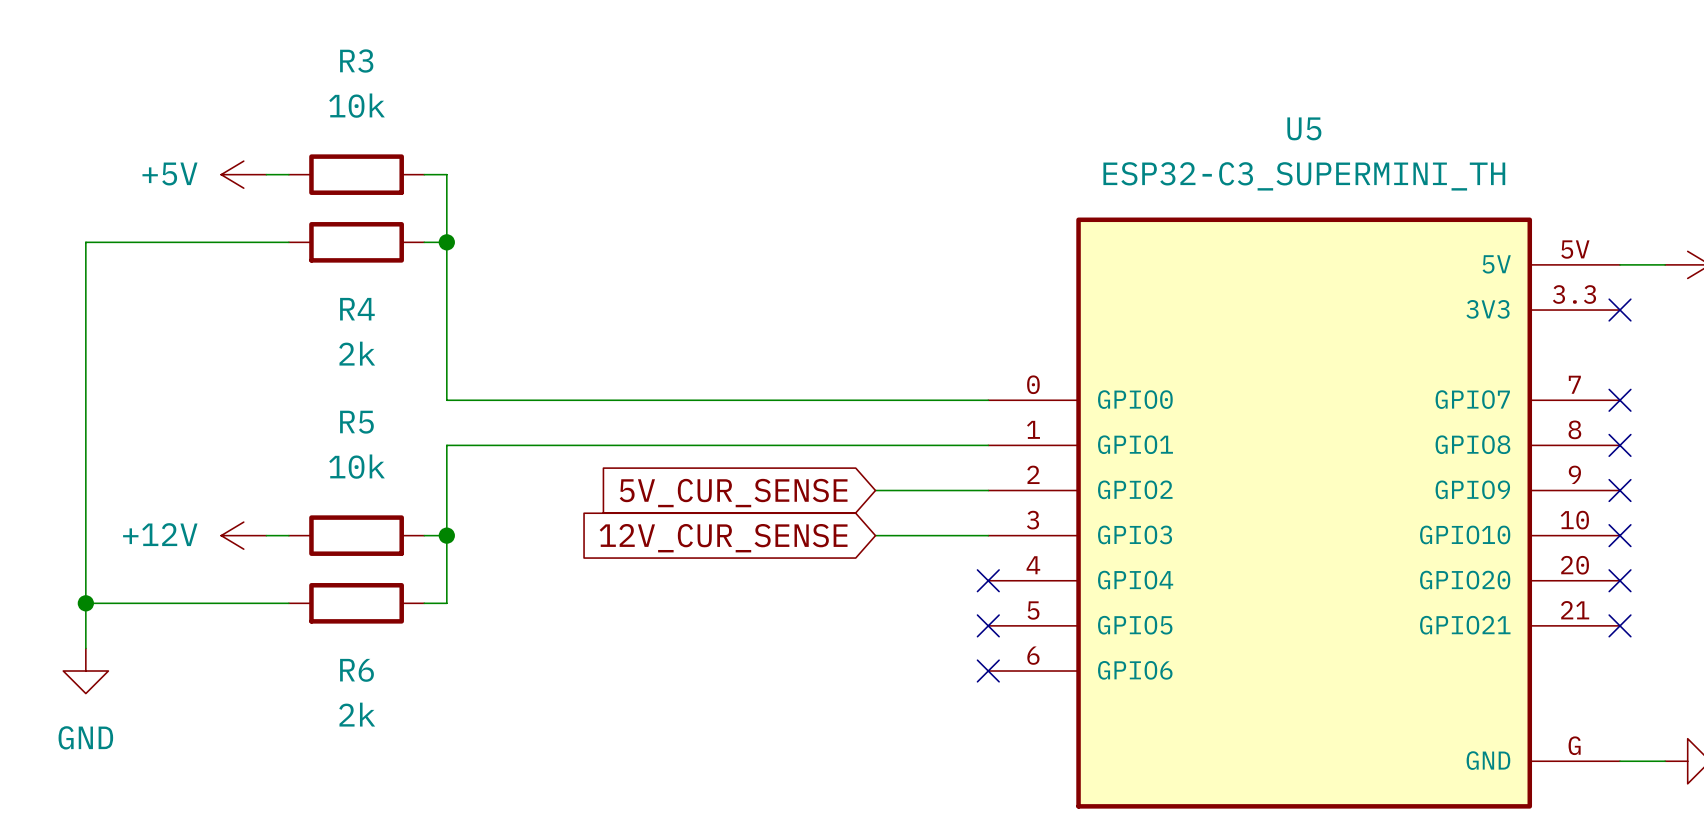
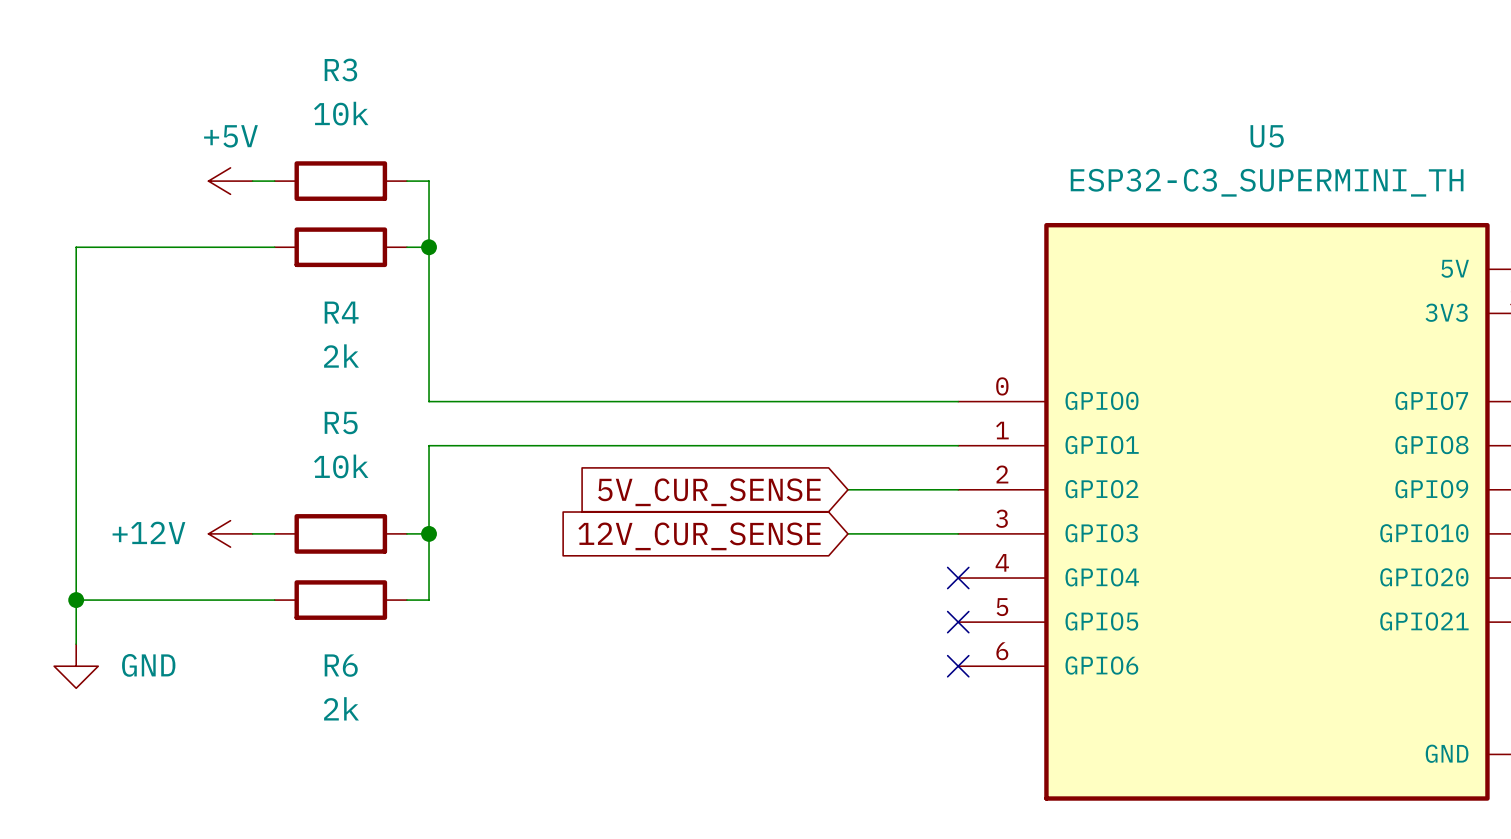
power symbol text position: +5V (169, 174) -> +5V (230, 136)
power symbol text position: GND (85, 737) -> GND (148, 665)

